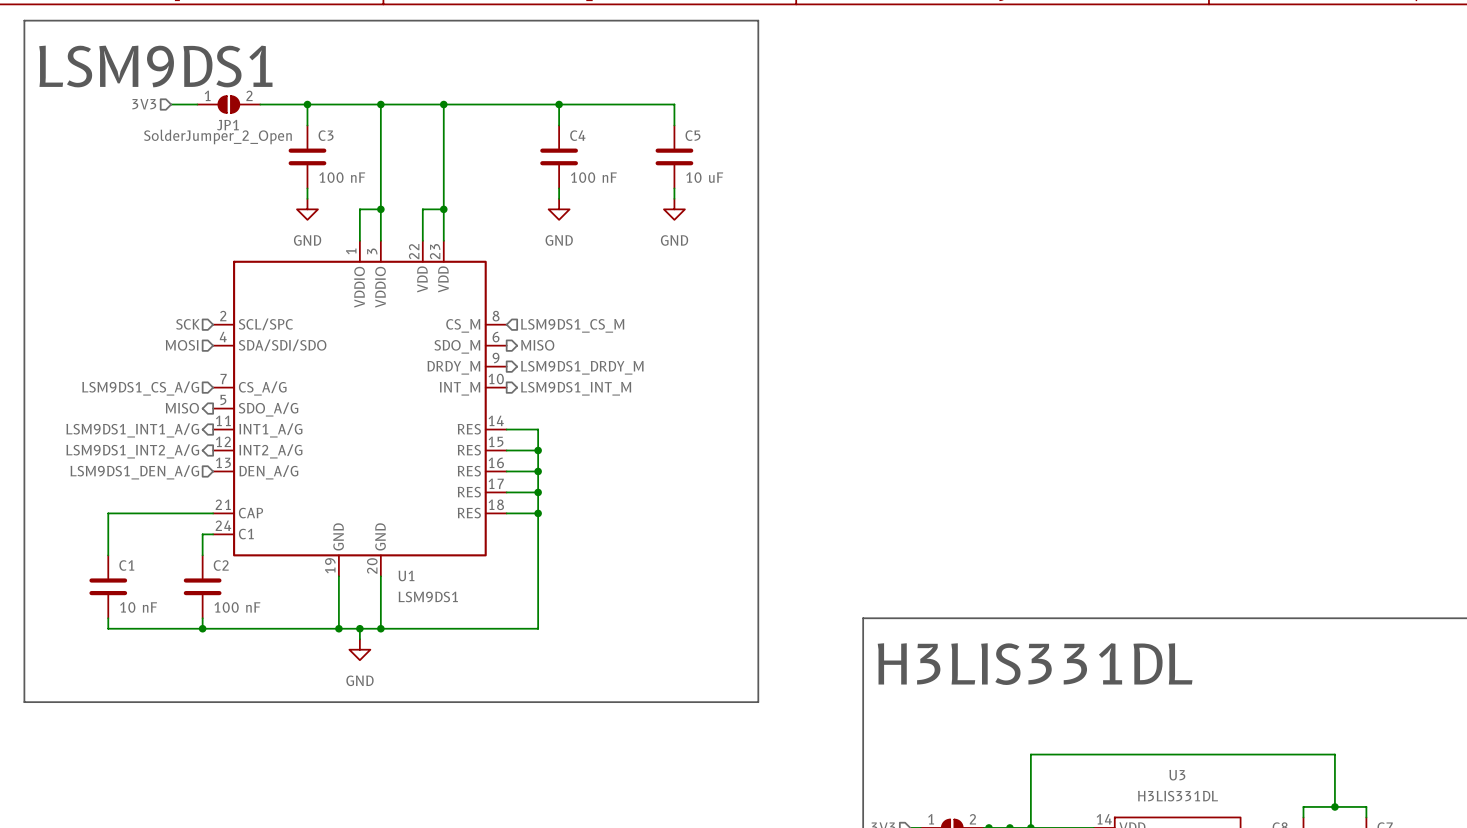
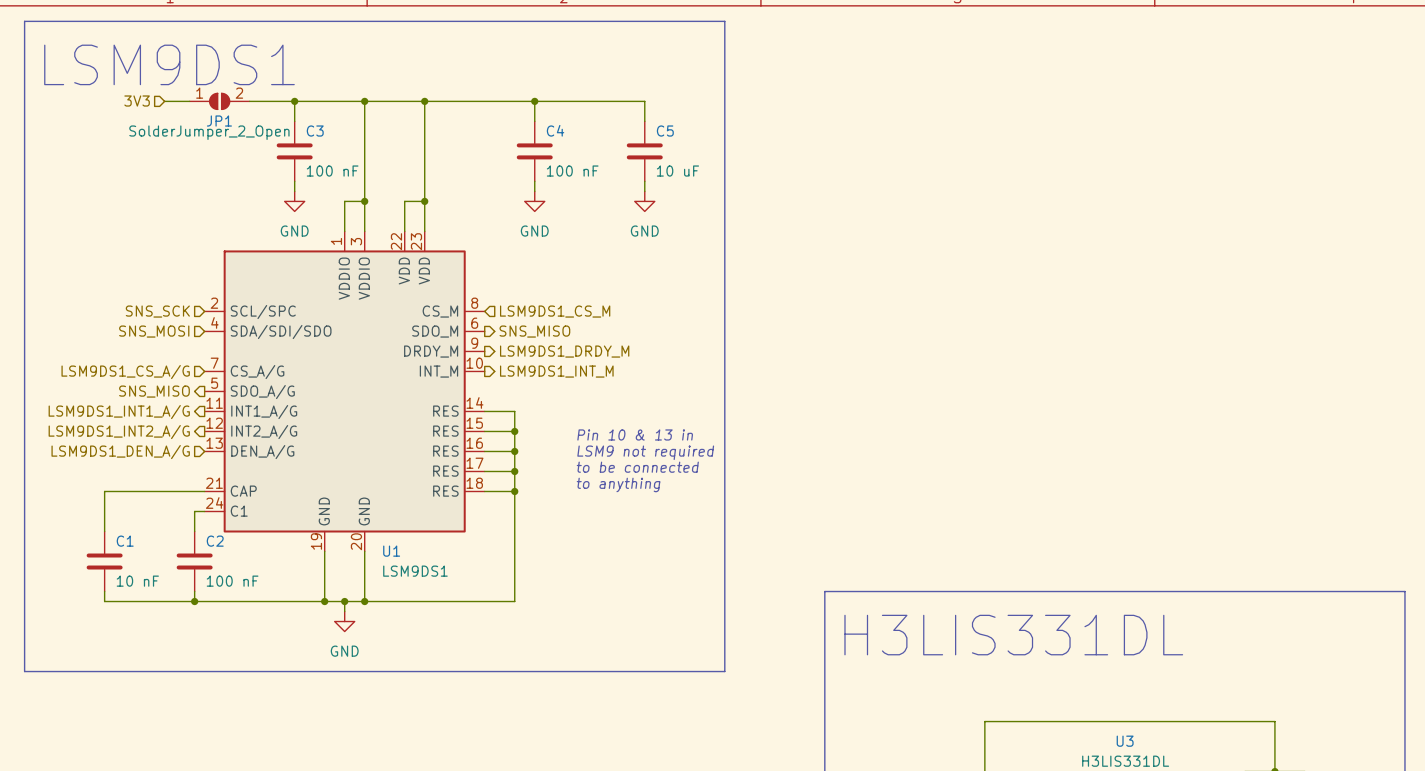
hierarchical label: SCK (187, 324) -> SNS_SCK (157, 311)
hierarchical label: MOSI (182, 345) -> SNS_MOSI (154, 331)
hierarchical label: MISO (537, 345) -> SNS_MISO (534, 331)
hierarchical label: MISO (182, 408) -> SNS_MISO (154, 391)
text: none -> Pin 10 & 13 in (635, 434)
text: none -> LSM9 not required (645, 452)
text: none -> to be connected (637, 467)
text: none -> to anything (618, 484)

